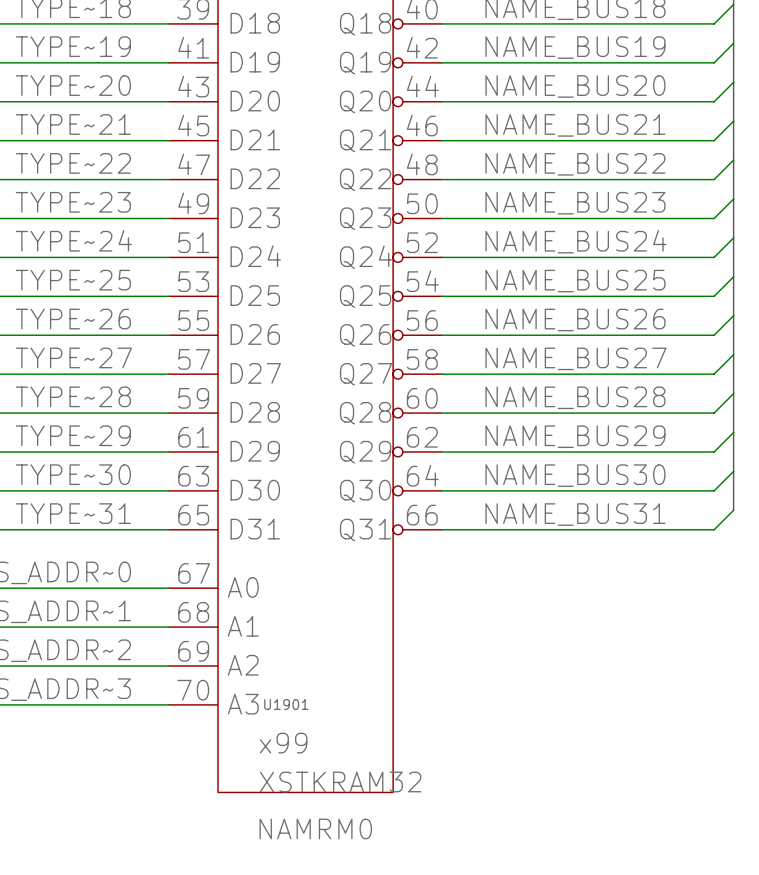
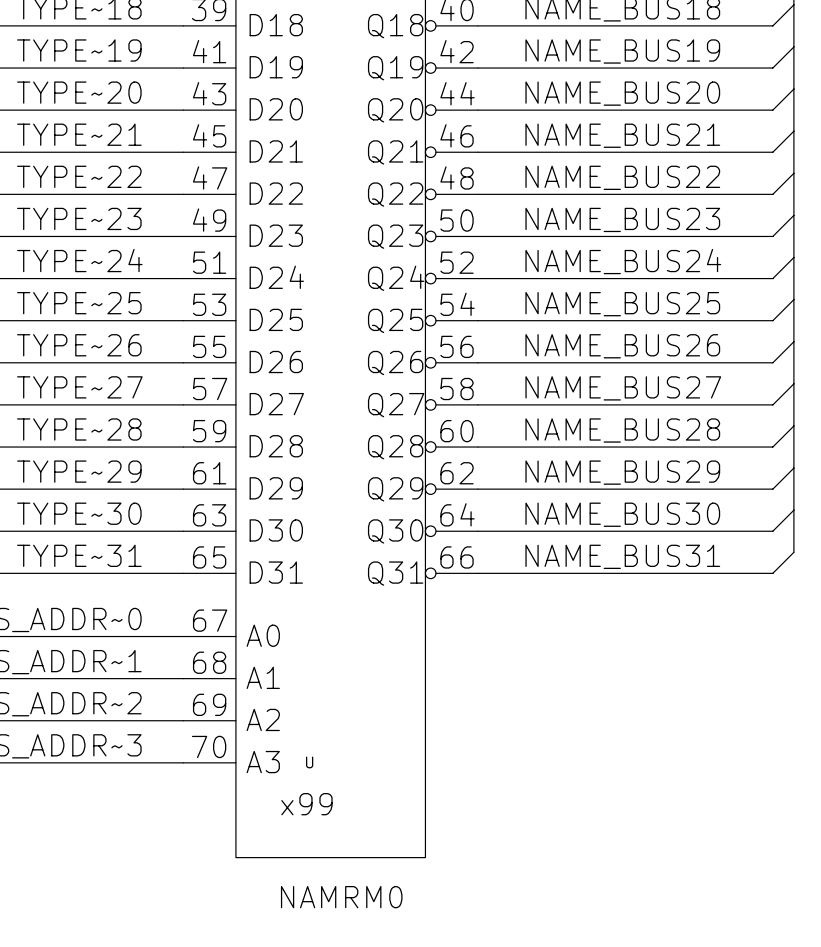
U1901 name: U1901 (286, 704) -> U (309, 762)
U1901 value: XSTKRAM32 (340, 782) -> none

